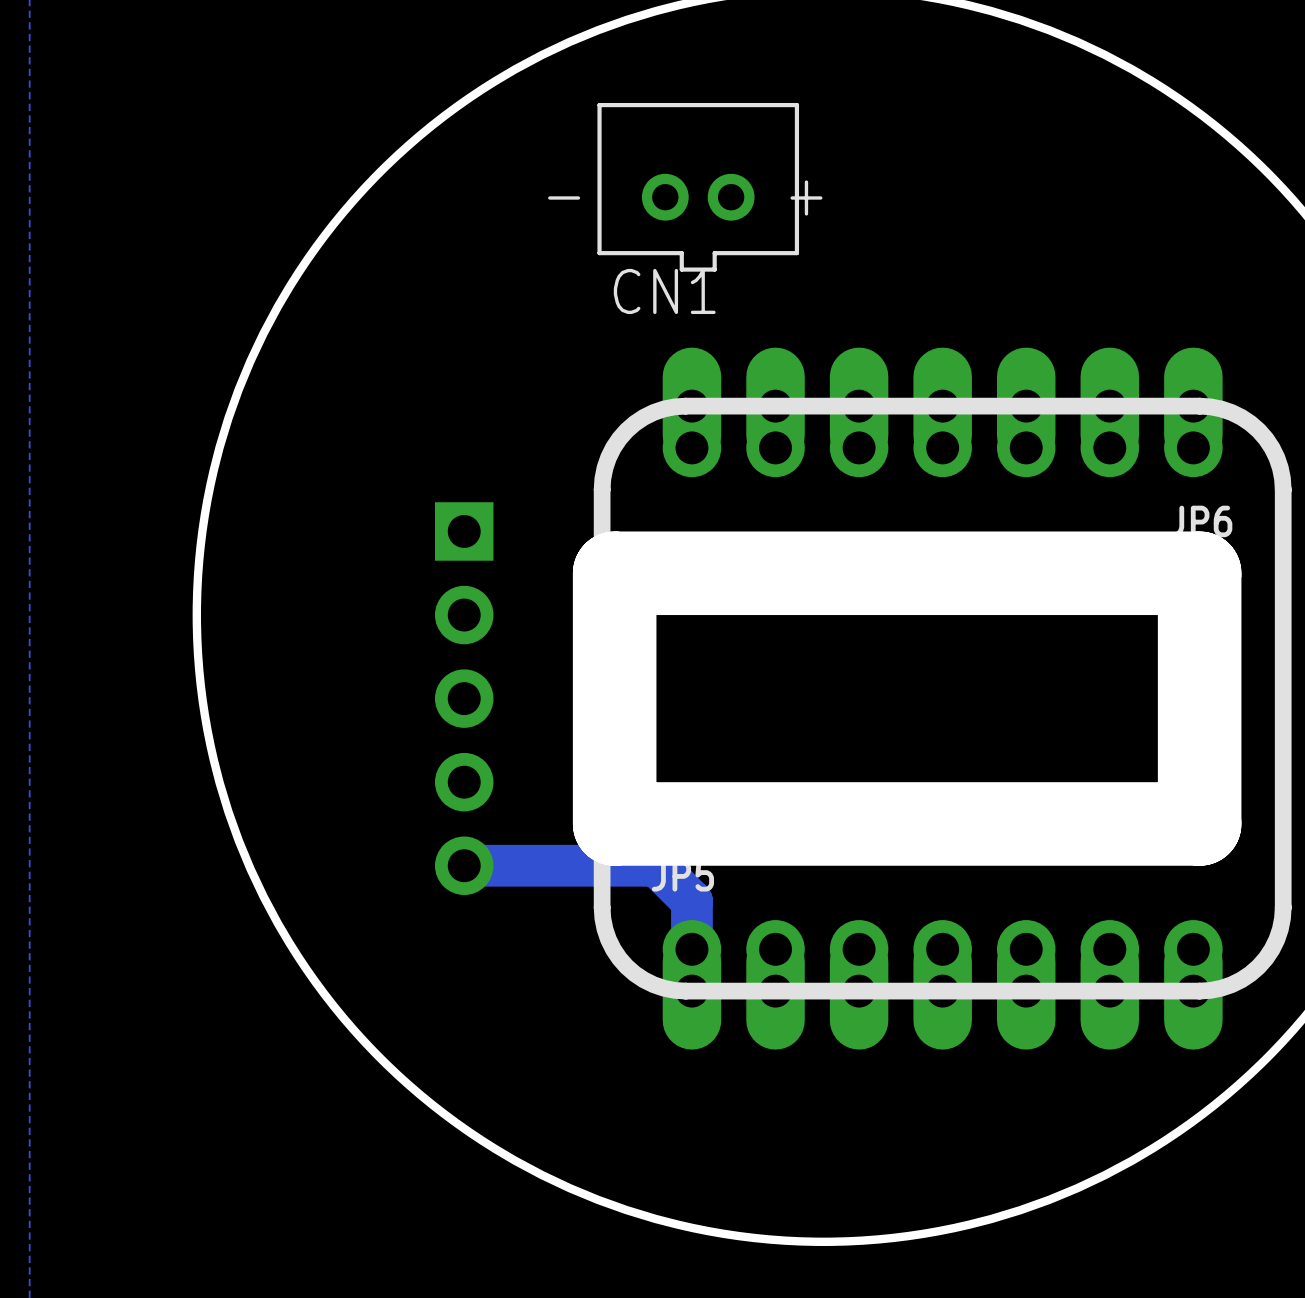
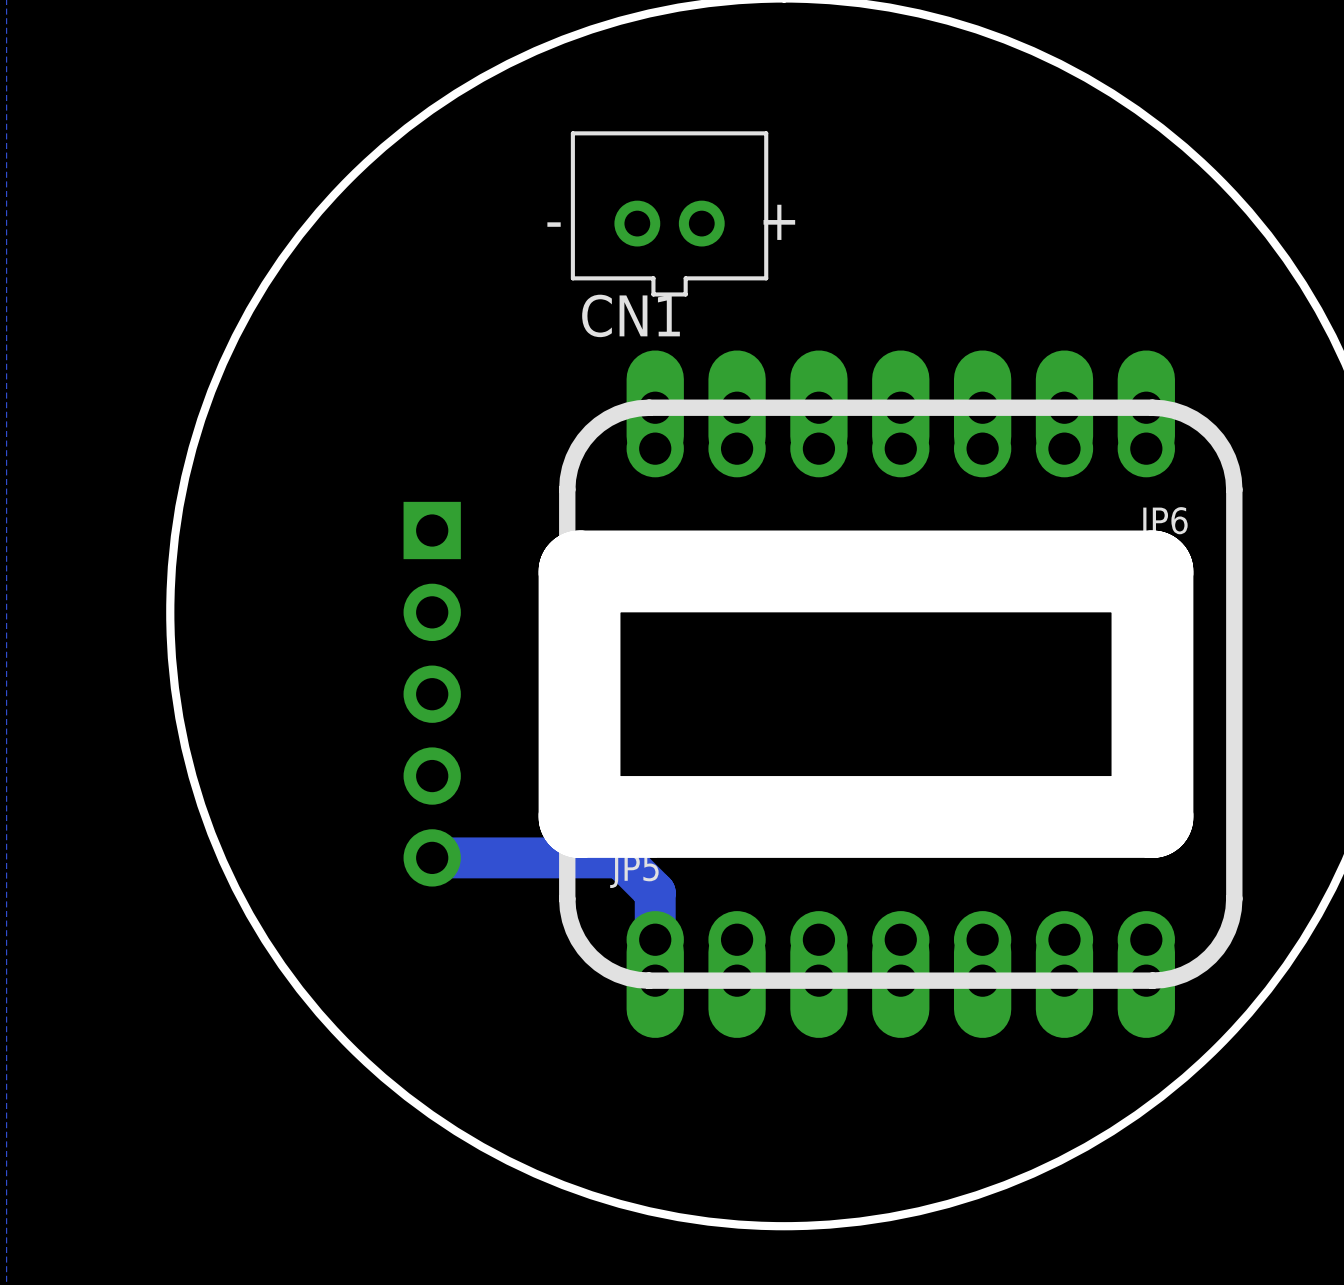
CN1 position: (698, 187) -> (669, 213)

